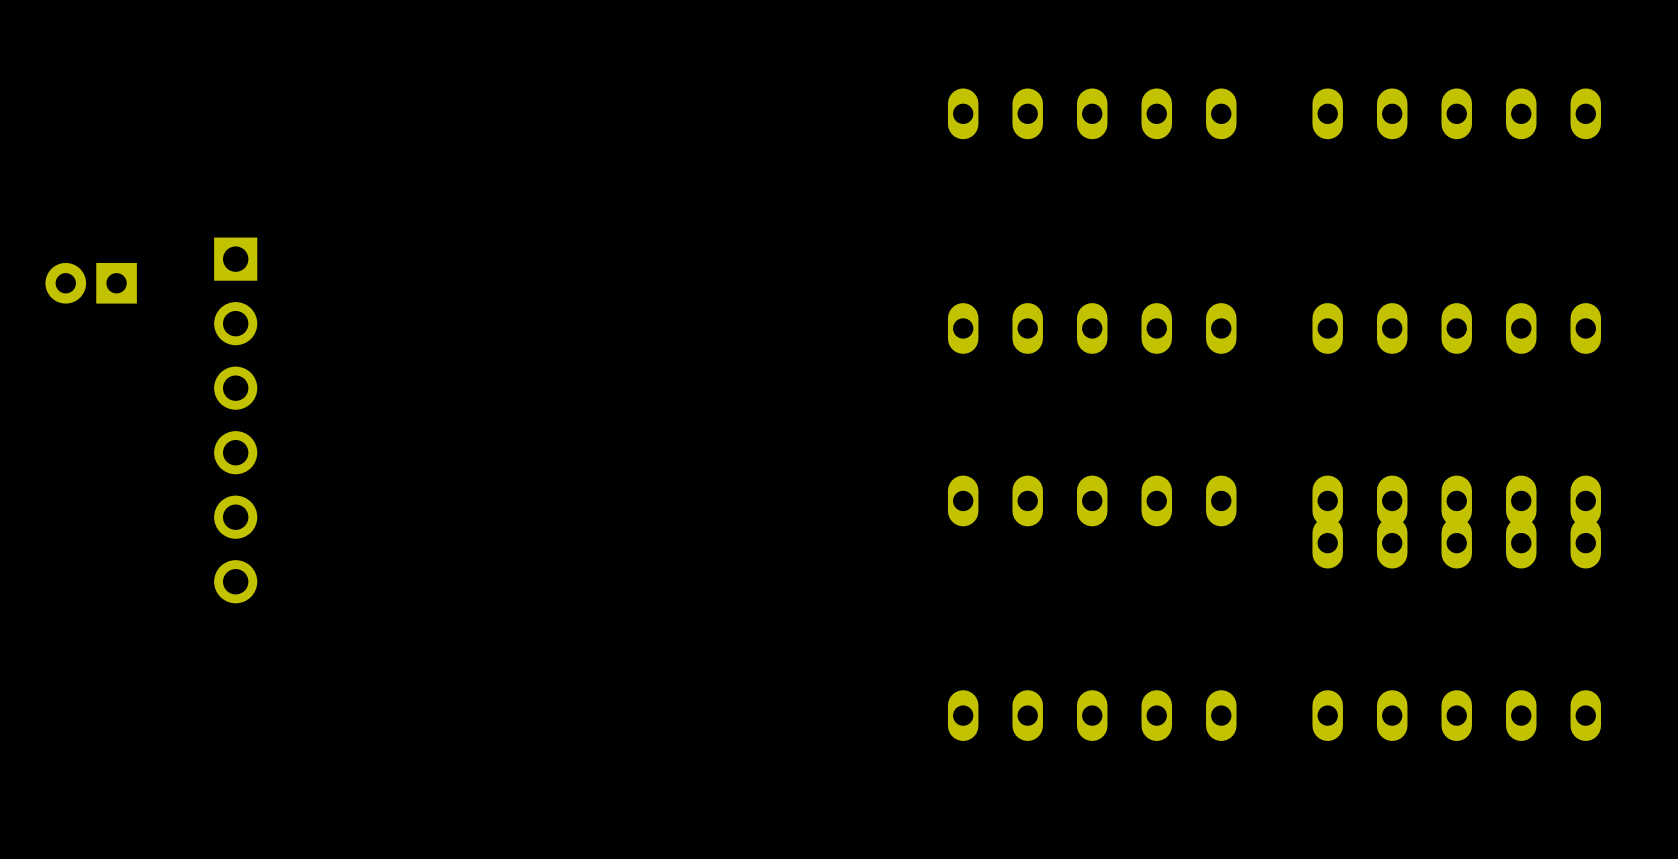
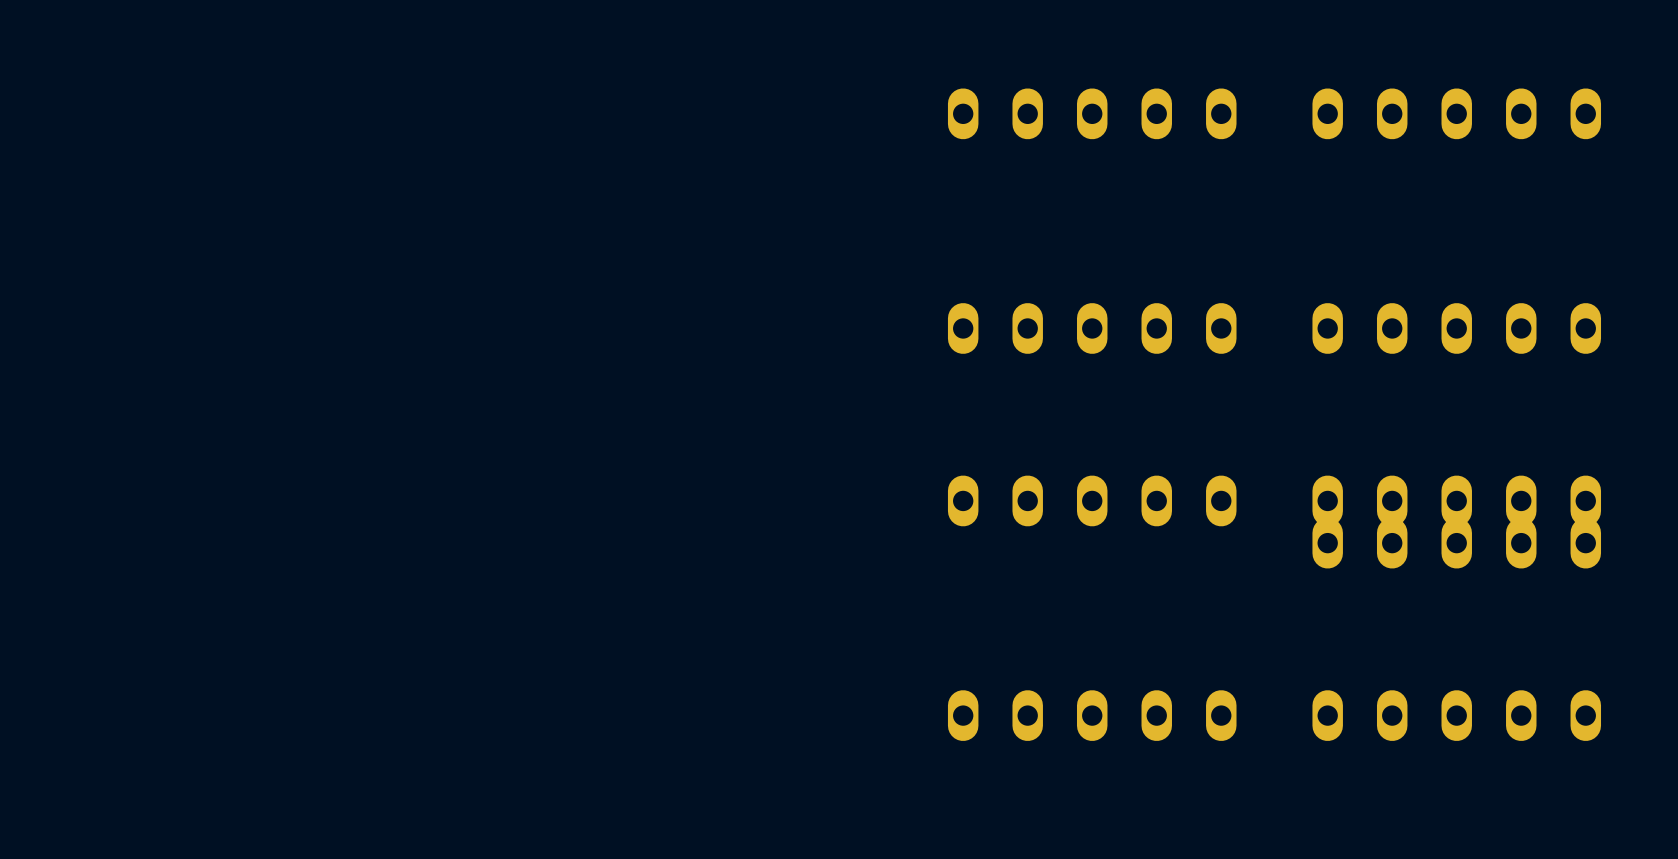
part: (91, 283) -> none
part: (235, 420) -> none

